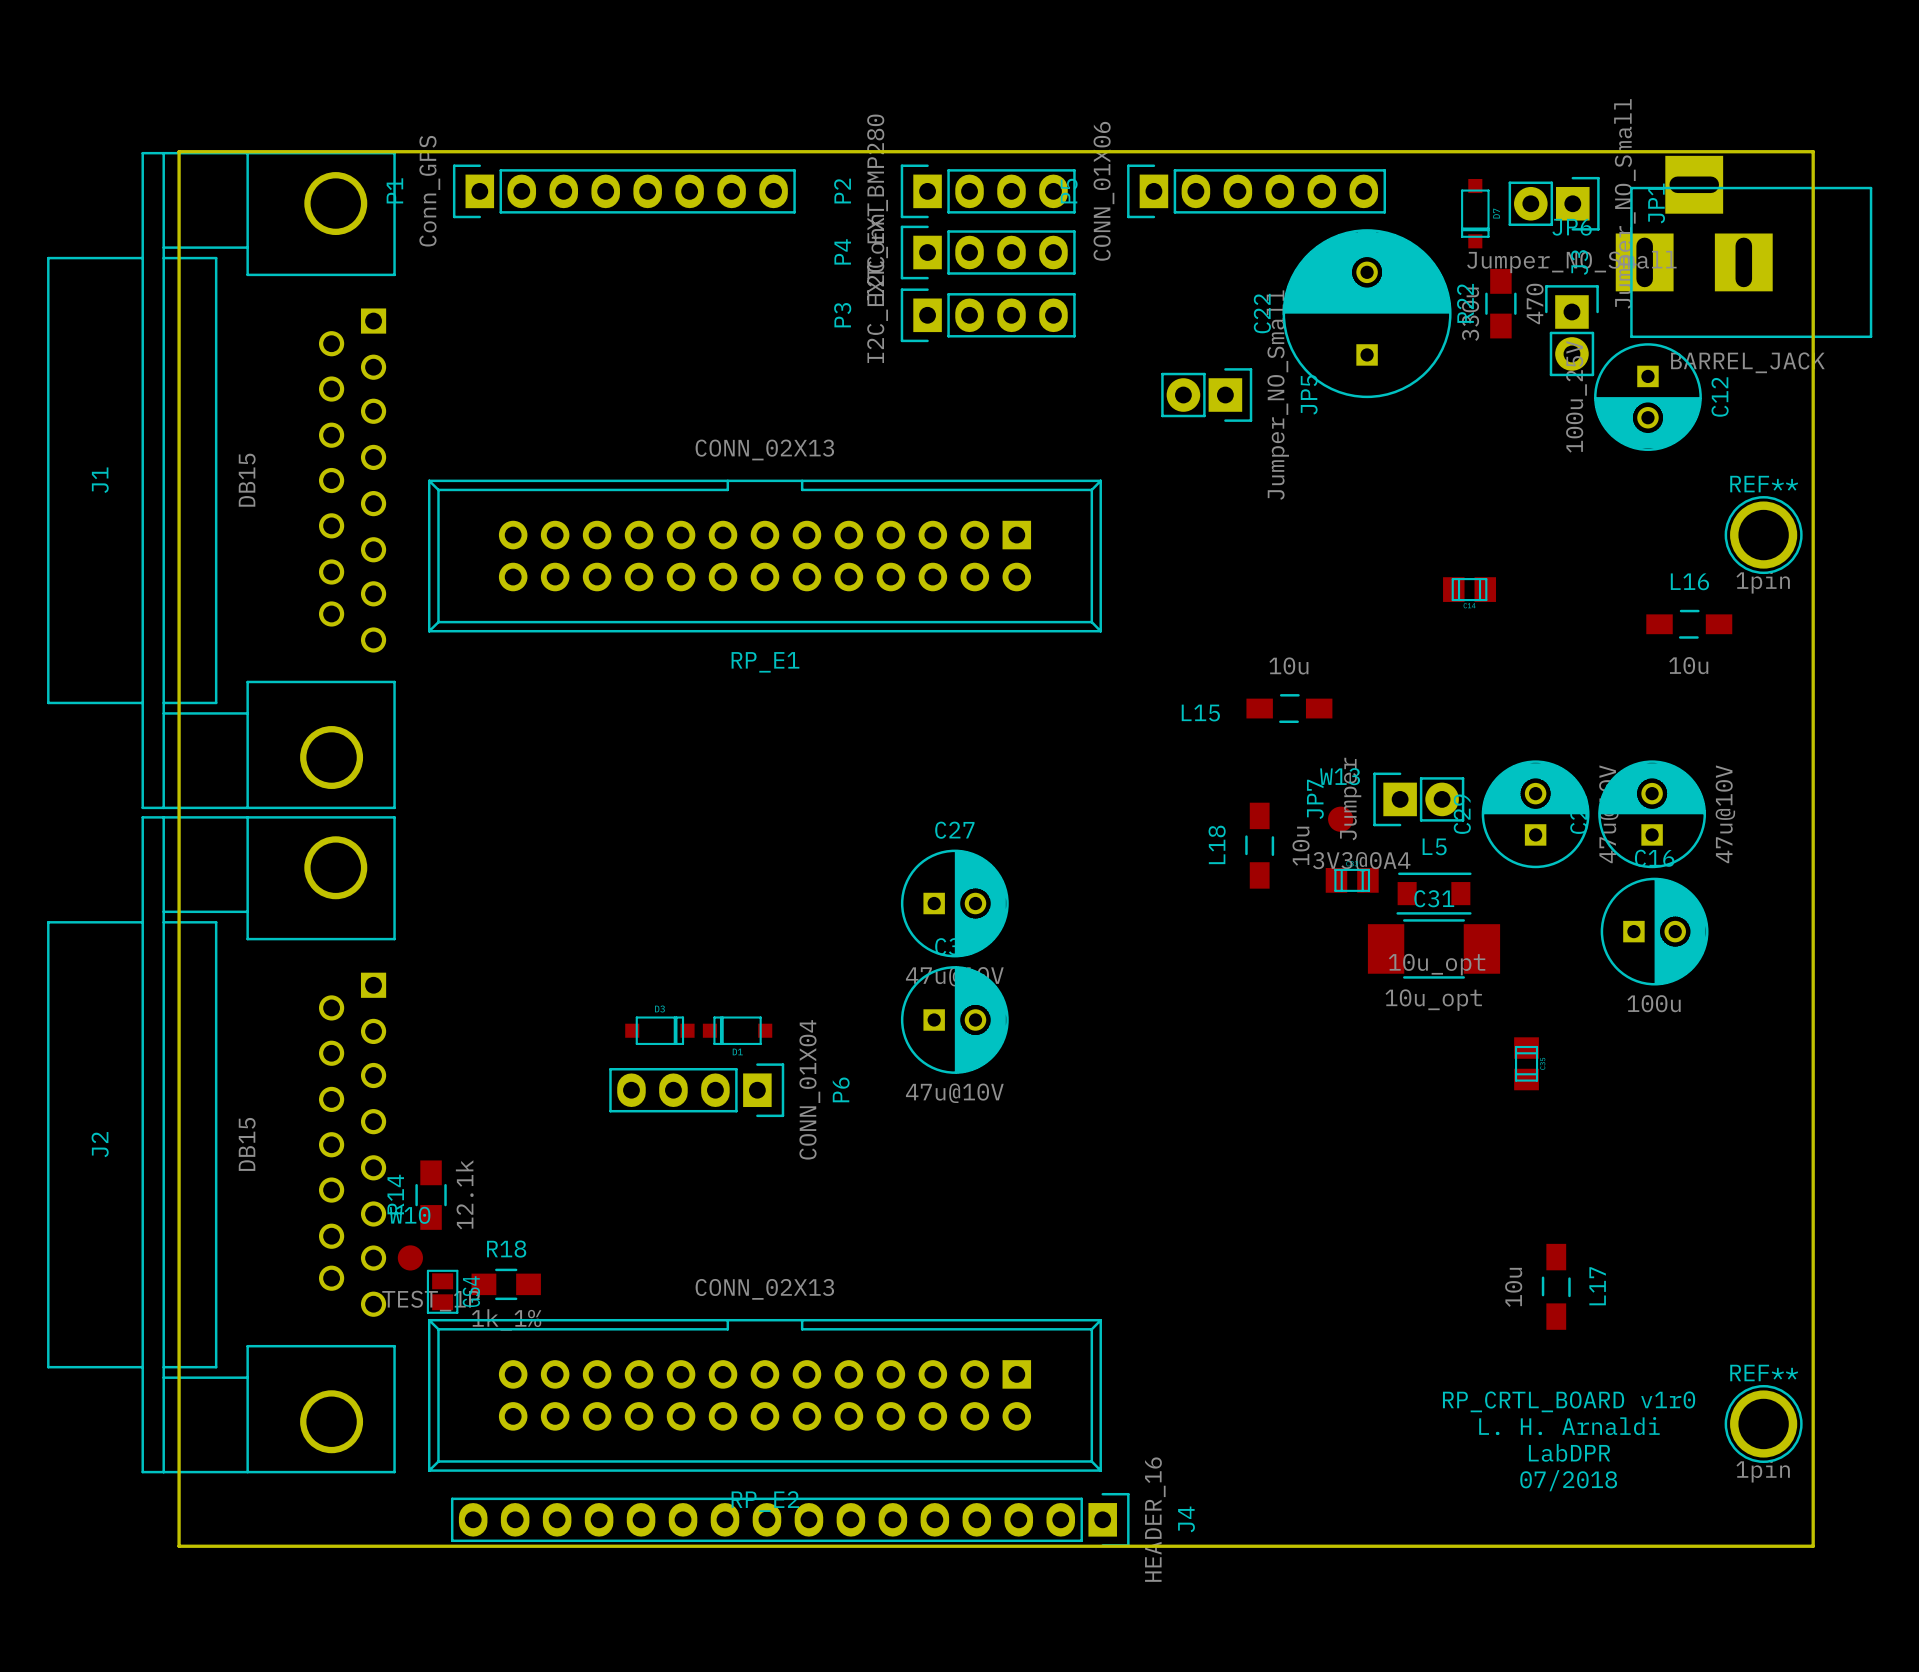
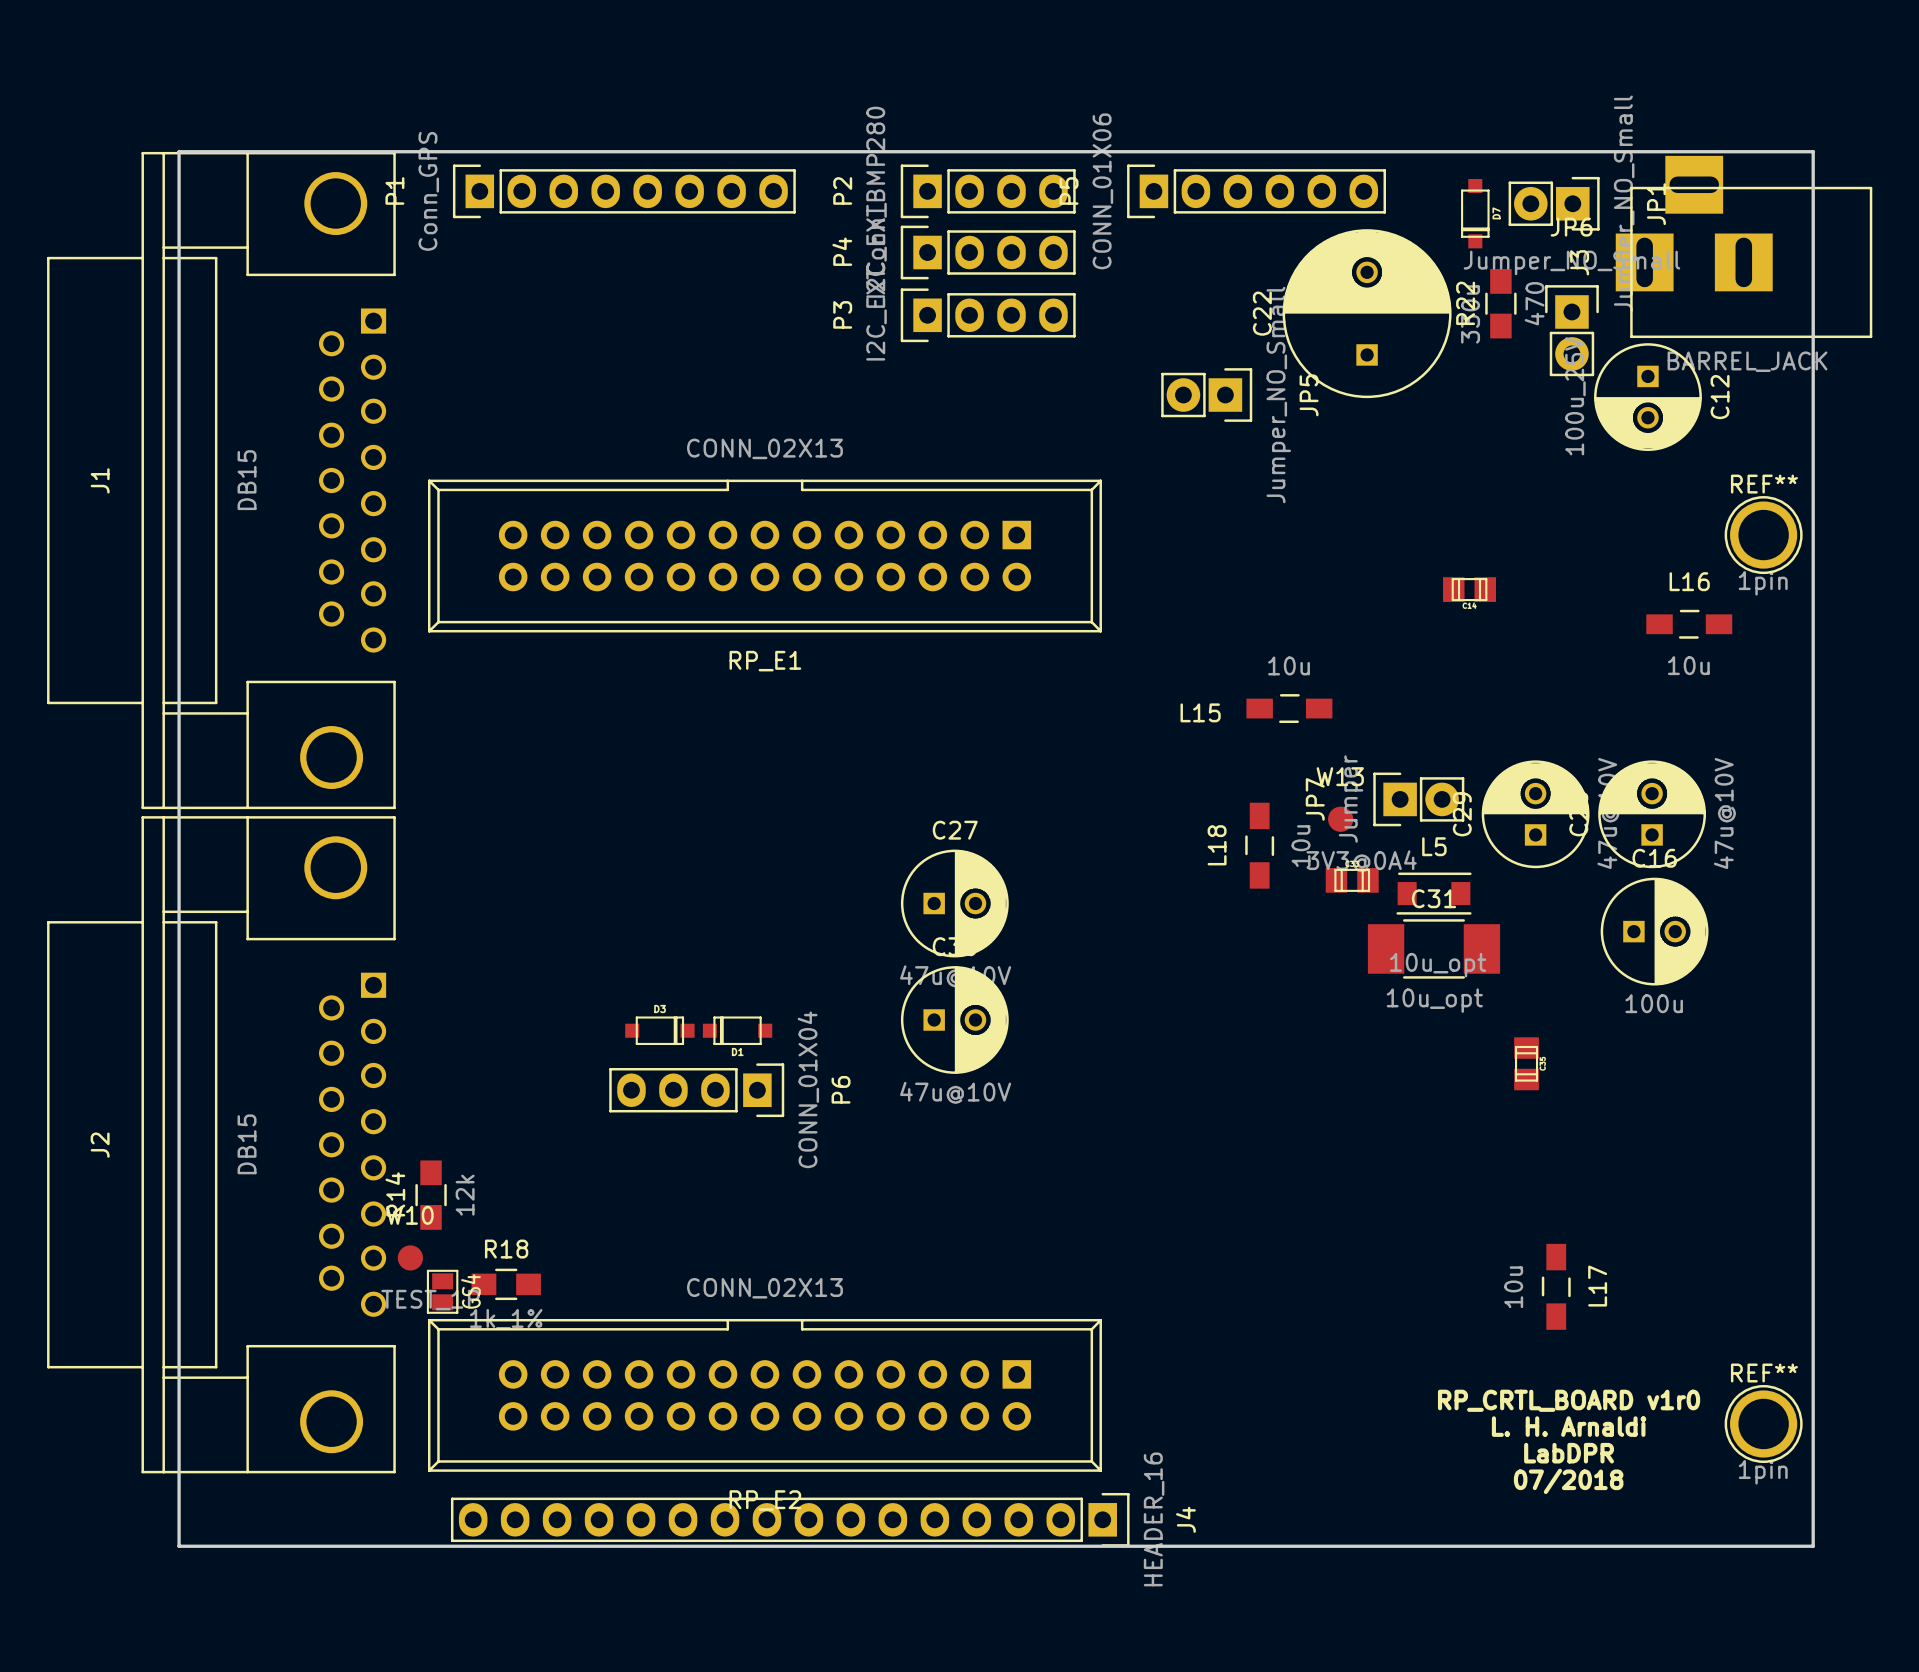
R14 value: 12.1k (464, 1194) -> 12k (465, 1195)

